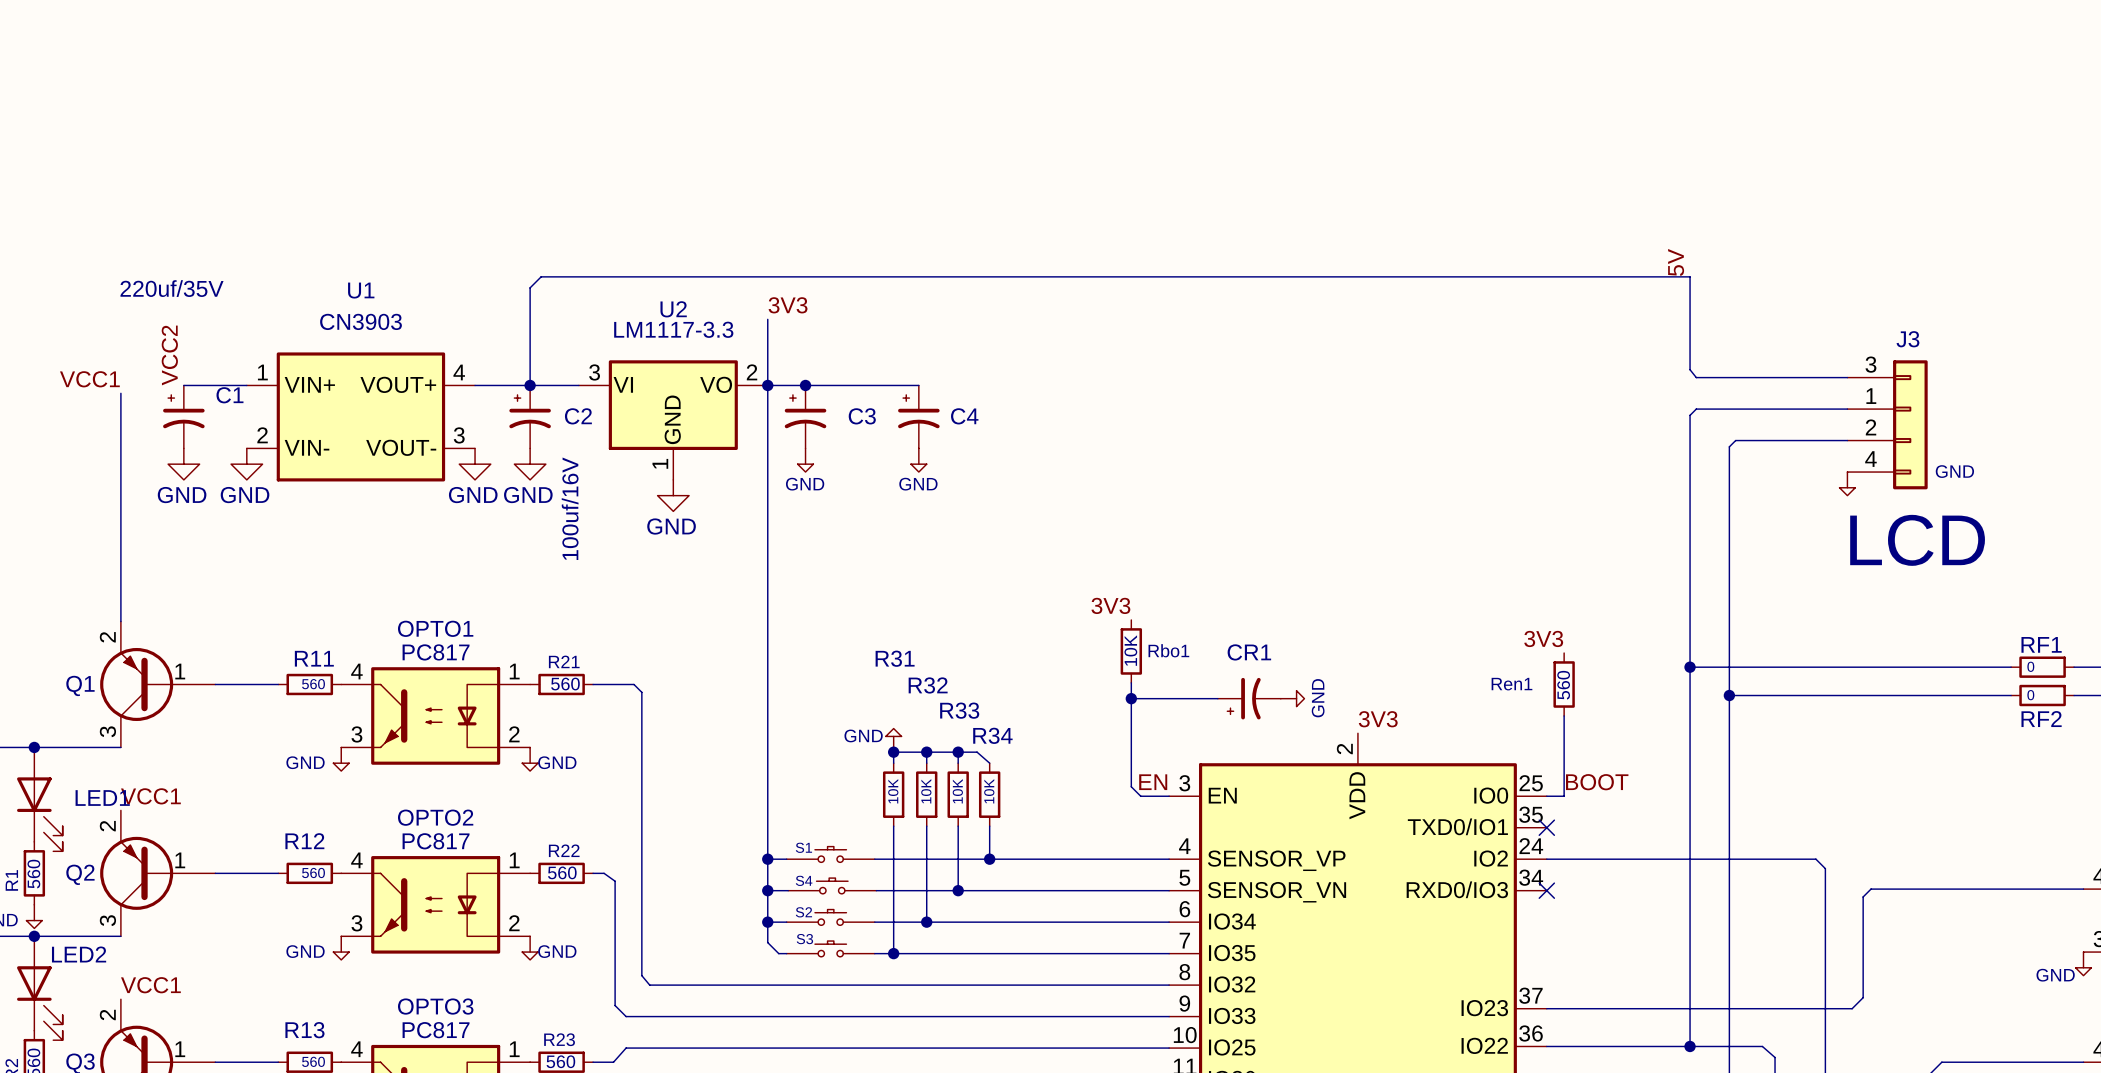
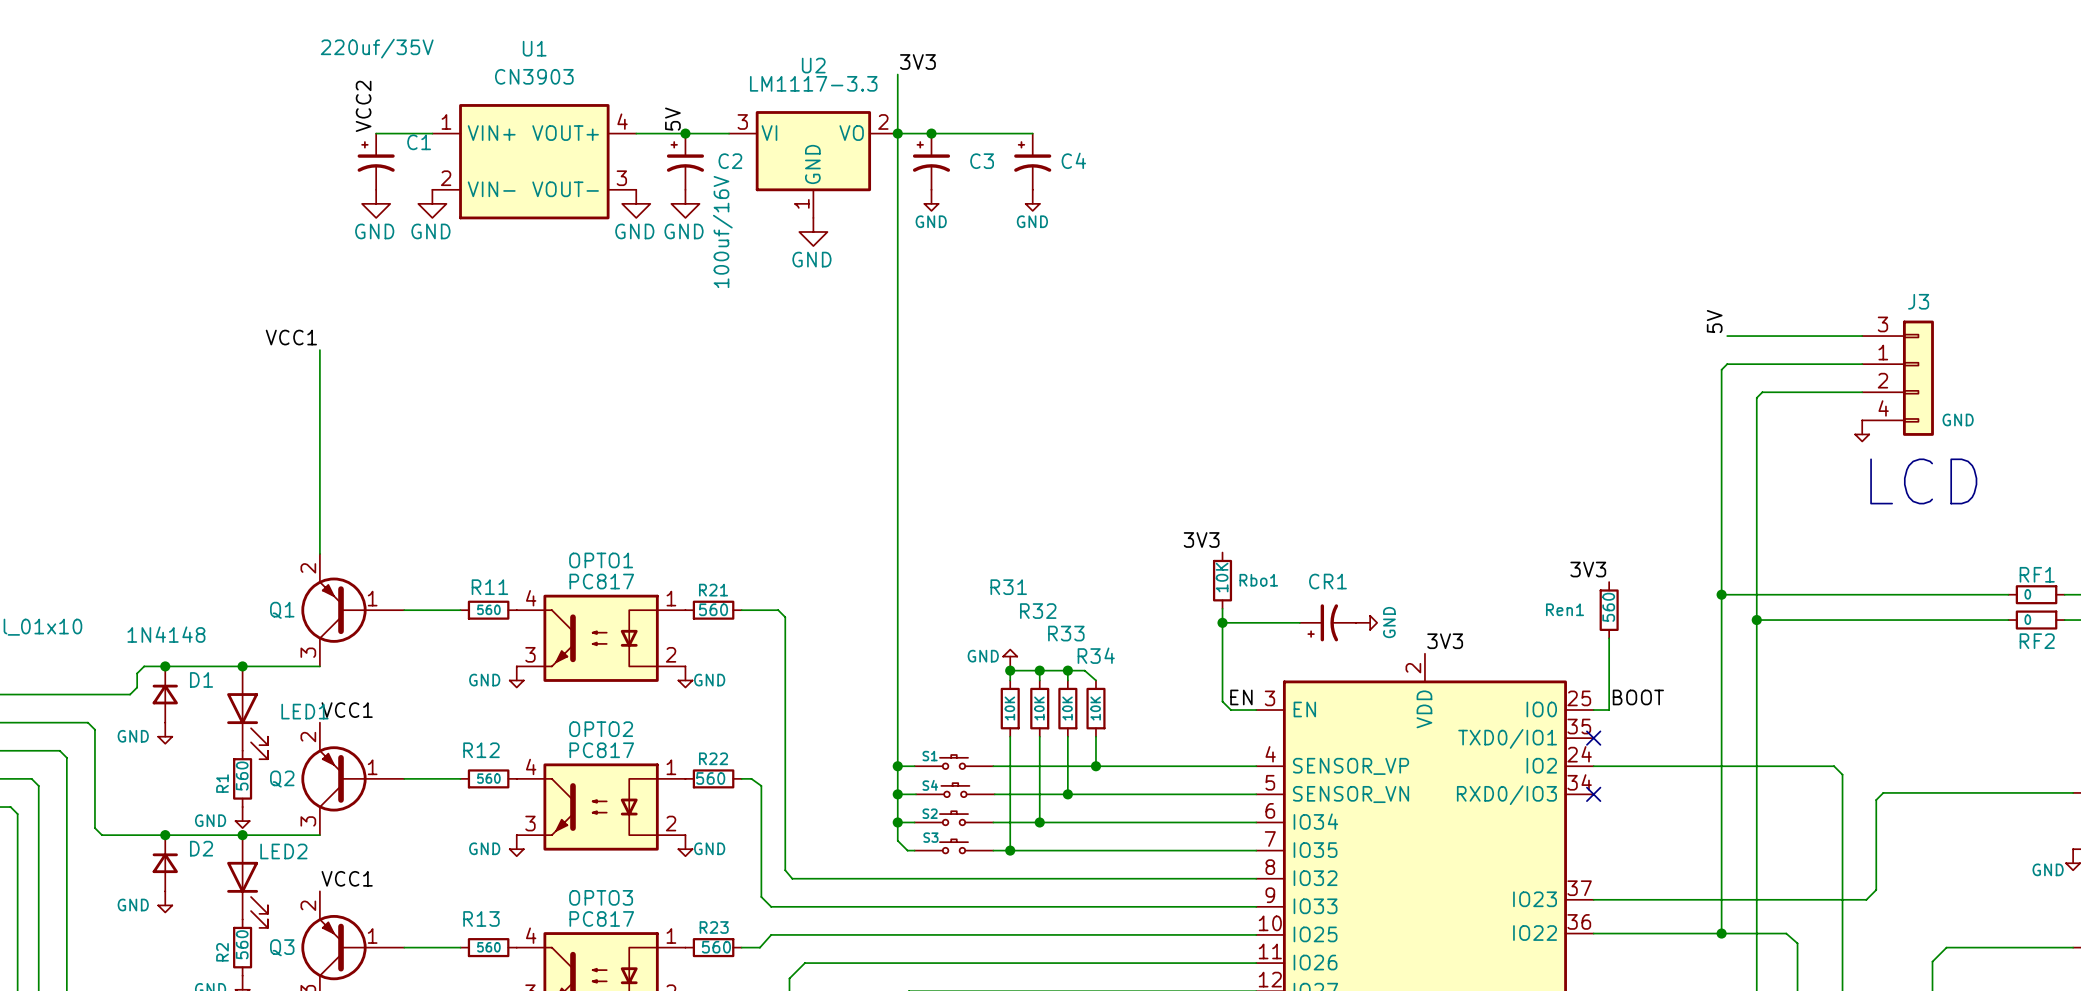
wire: none -> (897, 74) (897, 284)
label: none -> 5V (672, 119)
junction: none -> (685, 133)
junction: none -> (897, 133)
junction: none -> (931, 133)
power symbol: none -> GND (931, 200)
power symbol: none -> GND (1032, 200)
power symbol: none -> GND (376, 203)
power symbol: none -> GND (432, 203)
power symbol: none -> GND (636, 203)
power symbol: none -> GND (685, 203)
power symbol: none -> GND (813, 231)
label position: 5V (1676, 262) -> 5V (1714, 321)
label position: 3V3 (788, 305) -> 3V3 (917, 61)
label position: VCC2 (169, 355) -> VCC2 (363, 106)
wire: (1696, 377) (1690, 369) (1690, 276) (541, 276) (530, 287) (530, 385) -> none
wire: (183, 385) (246, 385) -> (376, 133) (432, 133)
wire: (475, 385) (578, 385) -> (636, 133) (729, 133)
junction: (530, 385) -> none
wire: (767, 385) (918, 385) -> (897, 133) (1032, 133)
junction: (767, 385) -> none
junction: (805, 385) -> none
C1 position: (183, 416) -> (376, 161)
U1 position: (360, 416) -> (534, 161)
C2 position: (530, 416) -> (685, 161)
C3 position: (805, 416) -> (931, 161)
C4 position: (918, 416) -> (1032, 161)
U2 position: (673, 420) -> (813, 164)
power symbol: GND (805, 460) -> none
power symbol: GND (918, 460) -> none
power symbol: GND (183, 464) -> none
power symbol: GND (246, 464) -> none
power symbol: GND (475, 464) -> none
power symbol: GND (530, 464) -> none
power symbol: GND (673, 495) -> none

